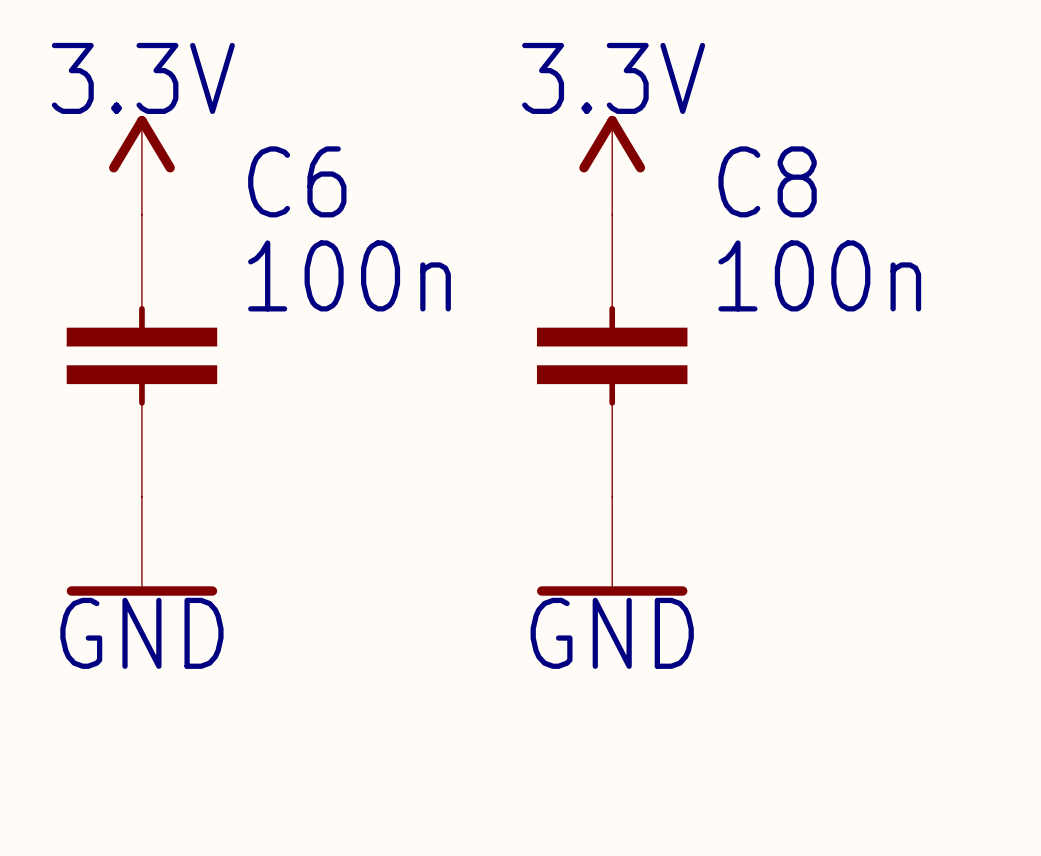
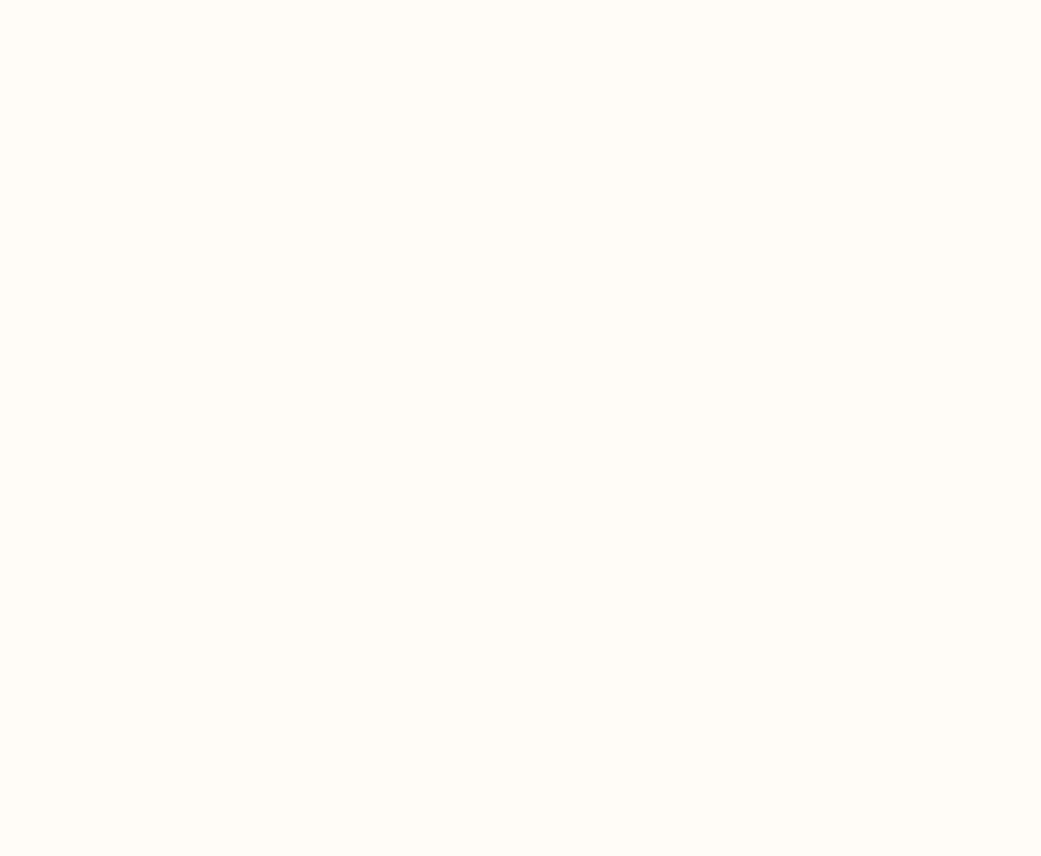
power symbol: 3.3V (141, 165) -> none
power symbol: 3.3V (612, 165) -> none
C6: 100n (141, 355) -> none
C8: 100n (612, 355) -> none
power symbol: GND (141, 546) -> none
power symbol: GND (612, 546) -> none

